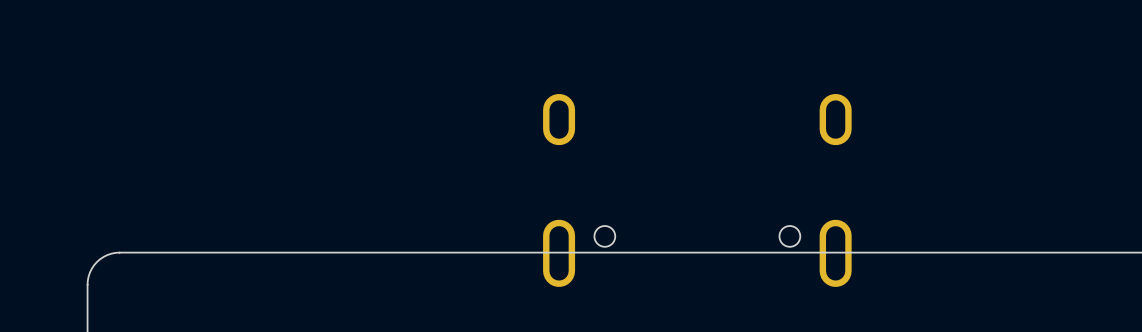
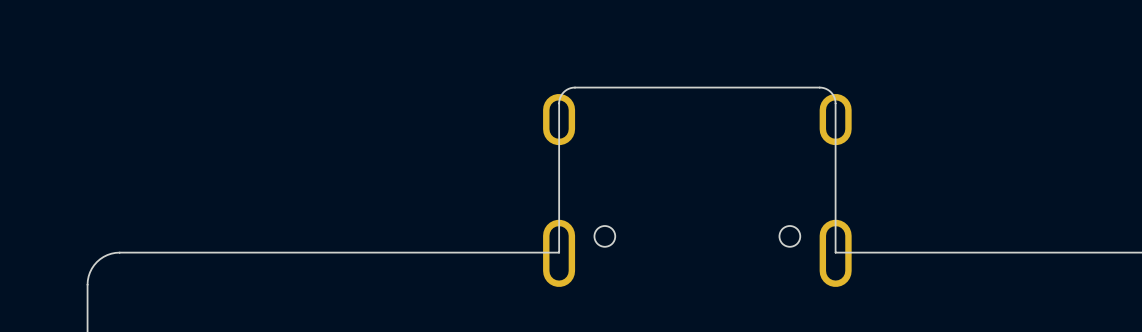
board edge: (559, 252) (835, 252) -> (559, 252) (559, 101) (563, 92) (574, 87) (819, 87) (827, 89) (833, 95) (835, 103) (835, 252)

